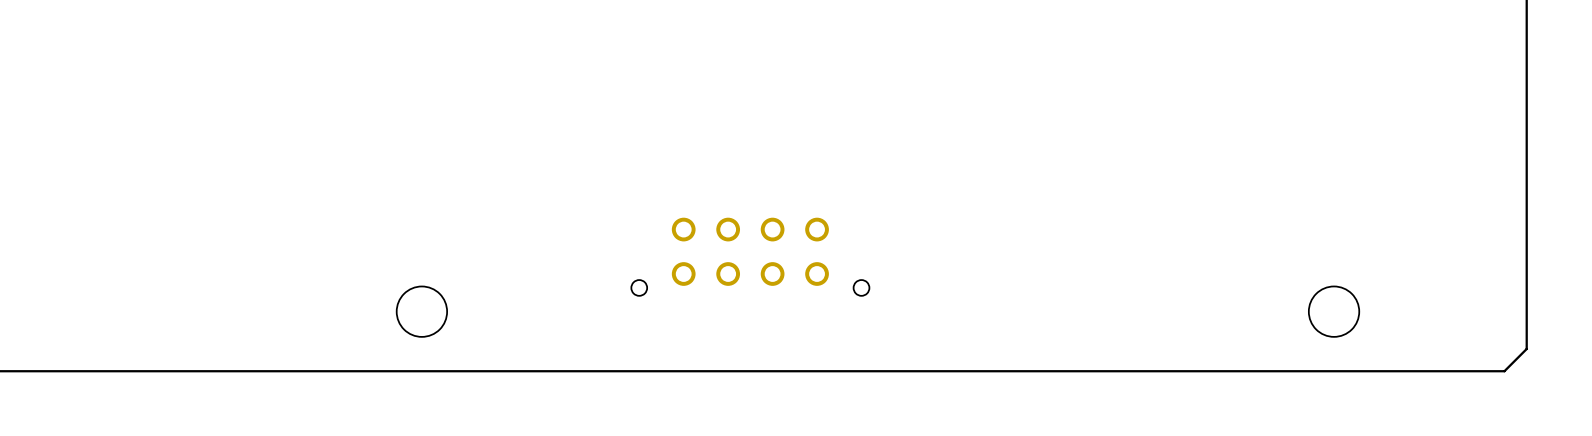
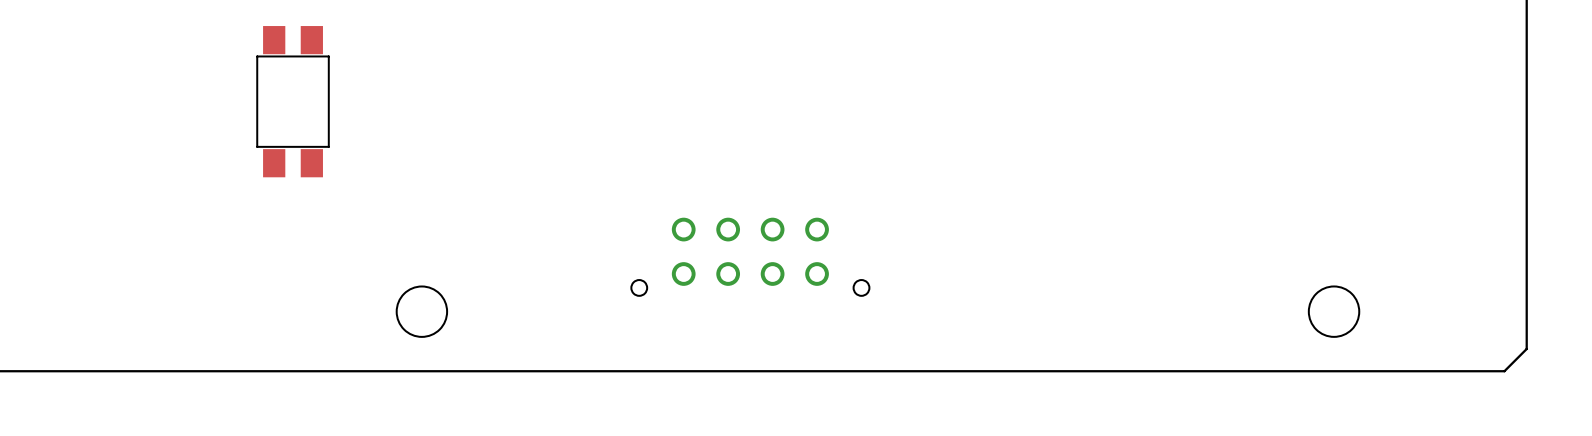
part: none -> (293, 101)

